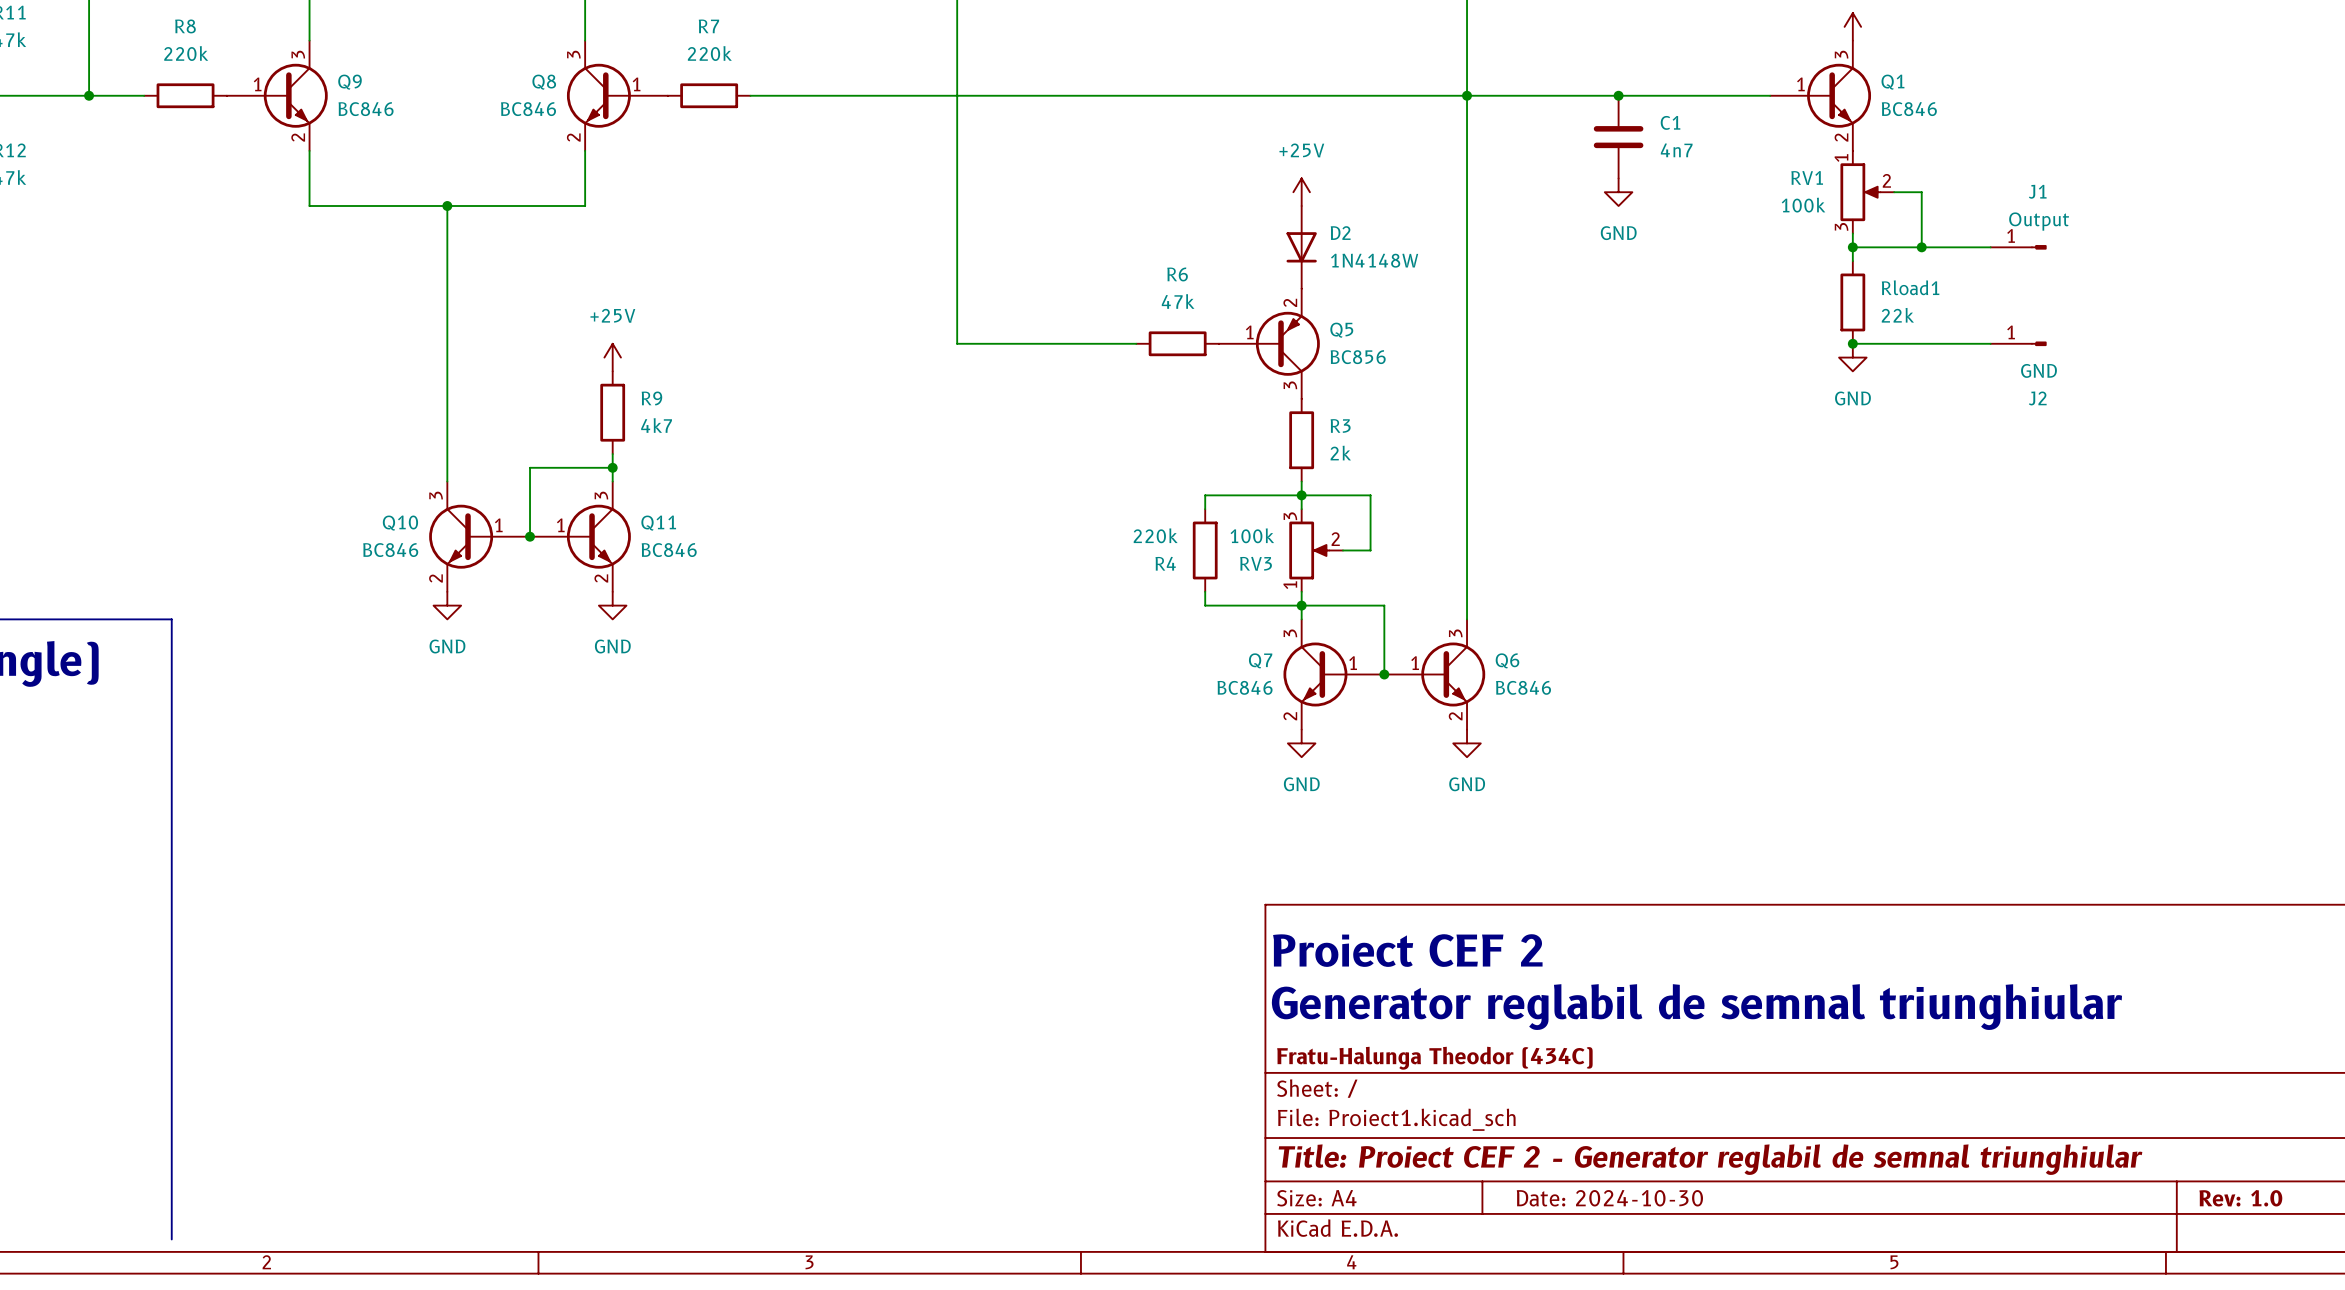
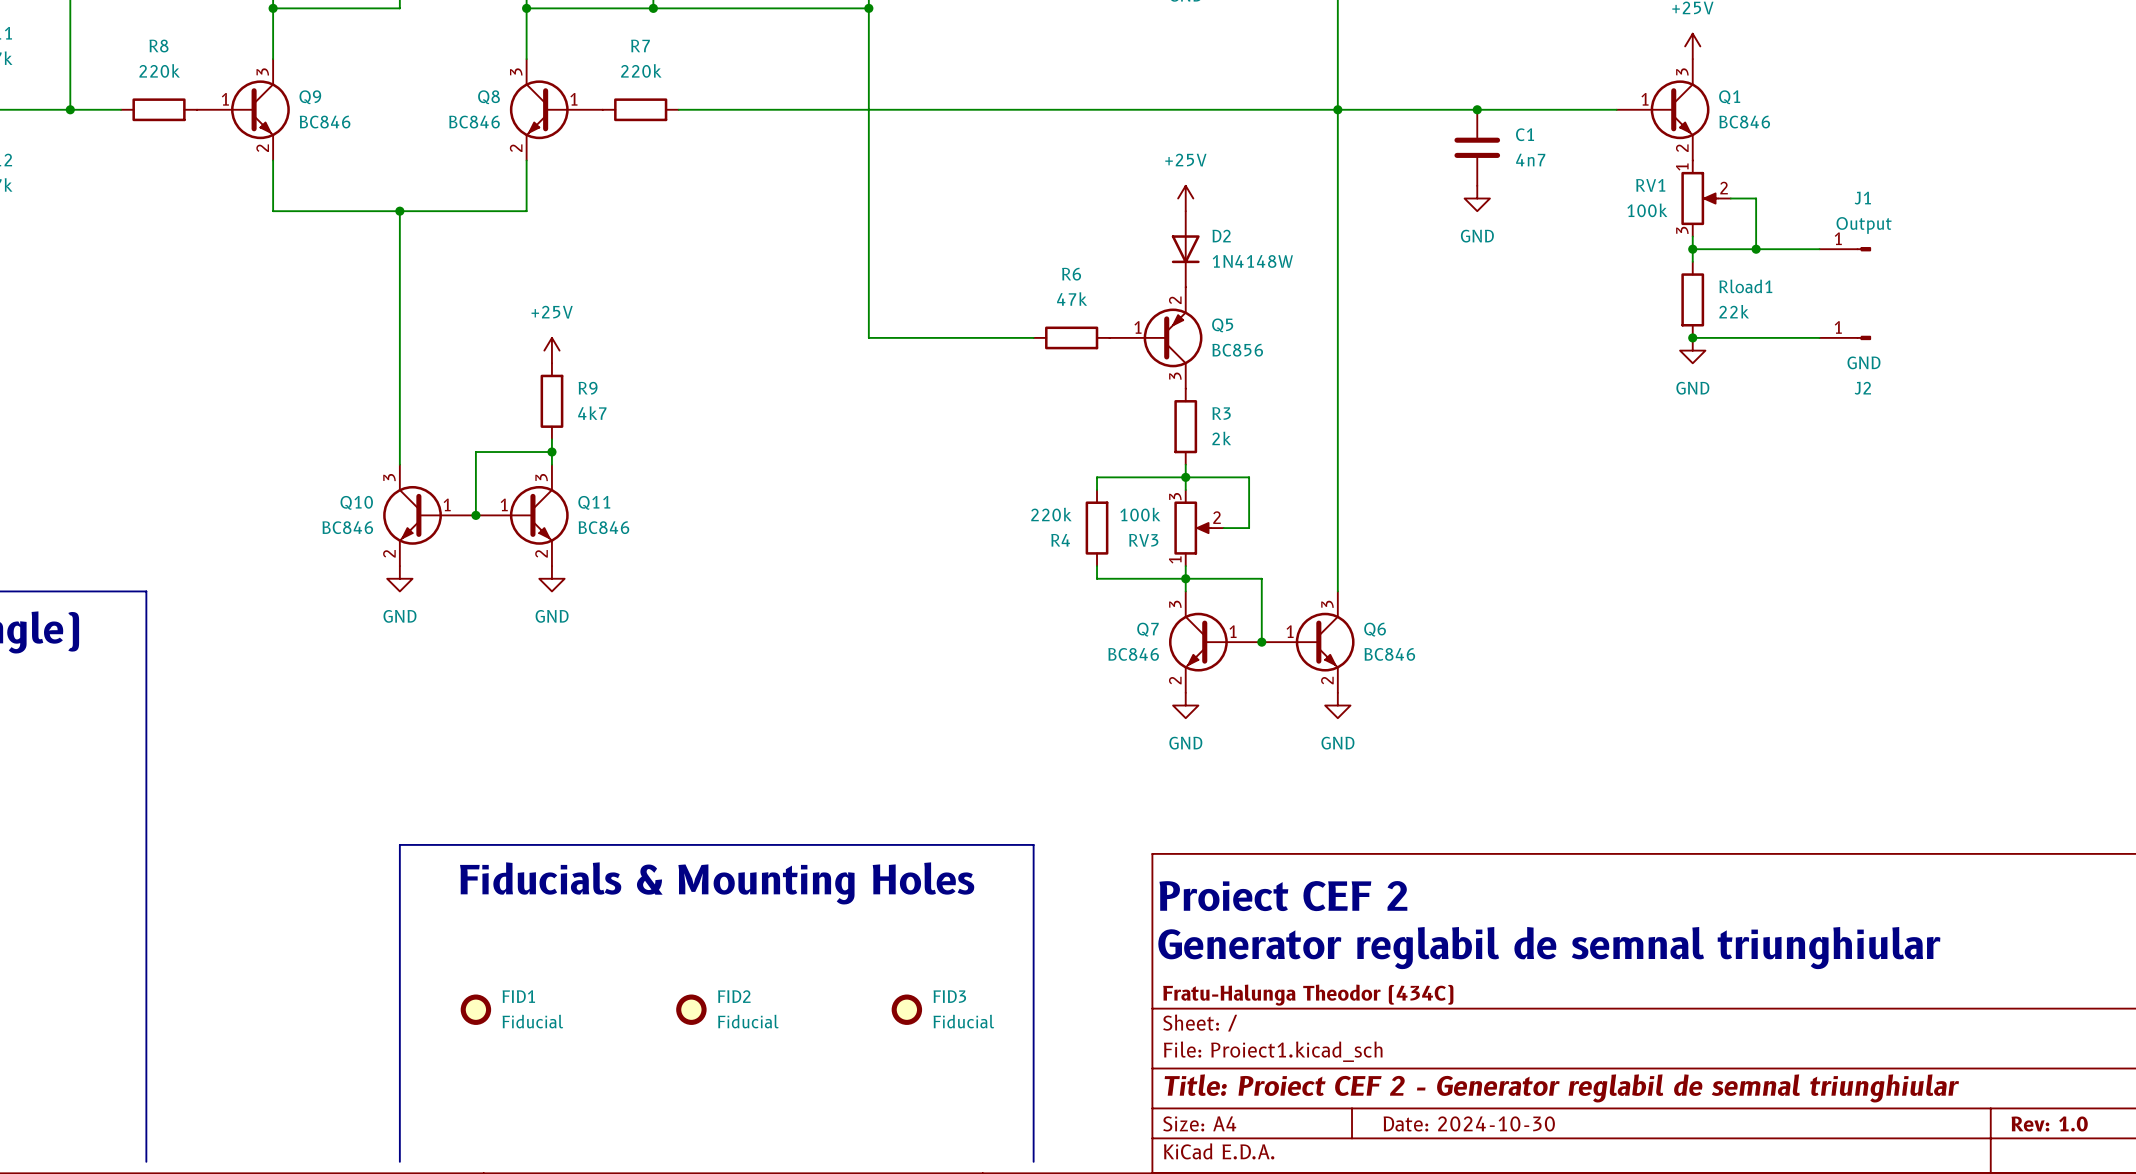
text: none -> Fiducials & Mounting Holes (717, 883)
FID1: none -> Fiducial (475, 1009)
FID2: none -> Fiducial (691, 1009)
FID3: none -> Fiducial (906, 1009)
line: none -> (399, 1161) (399, 844) (1033, 844) (1033, 1161)

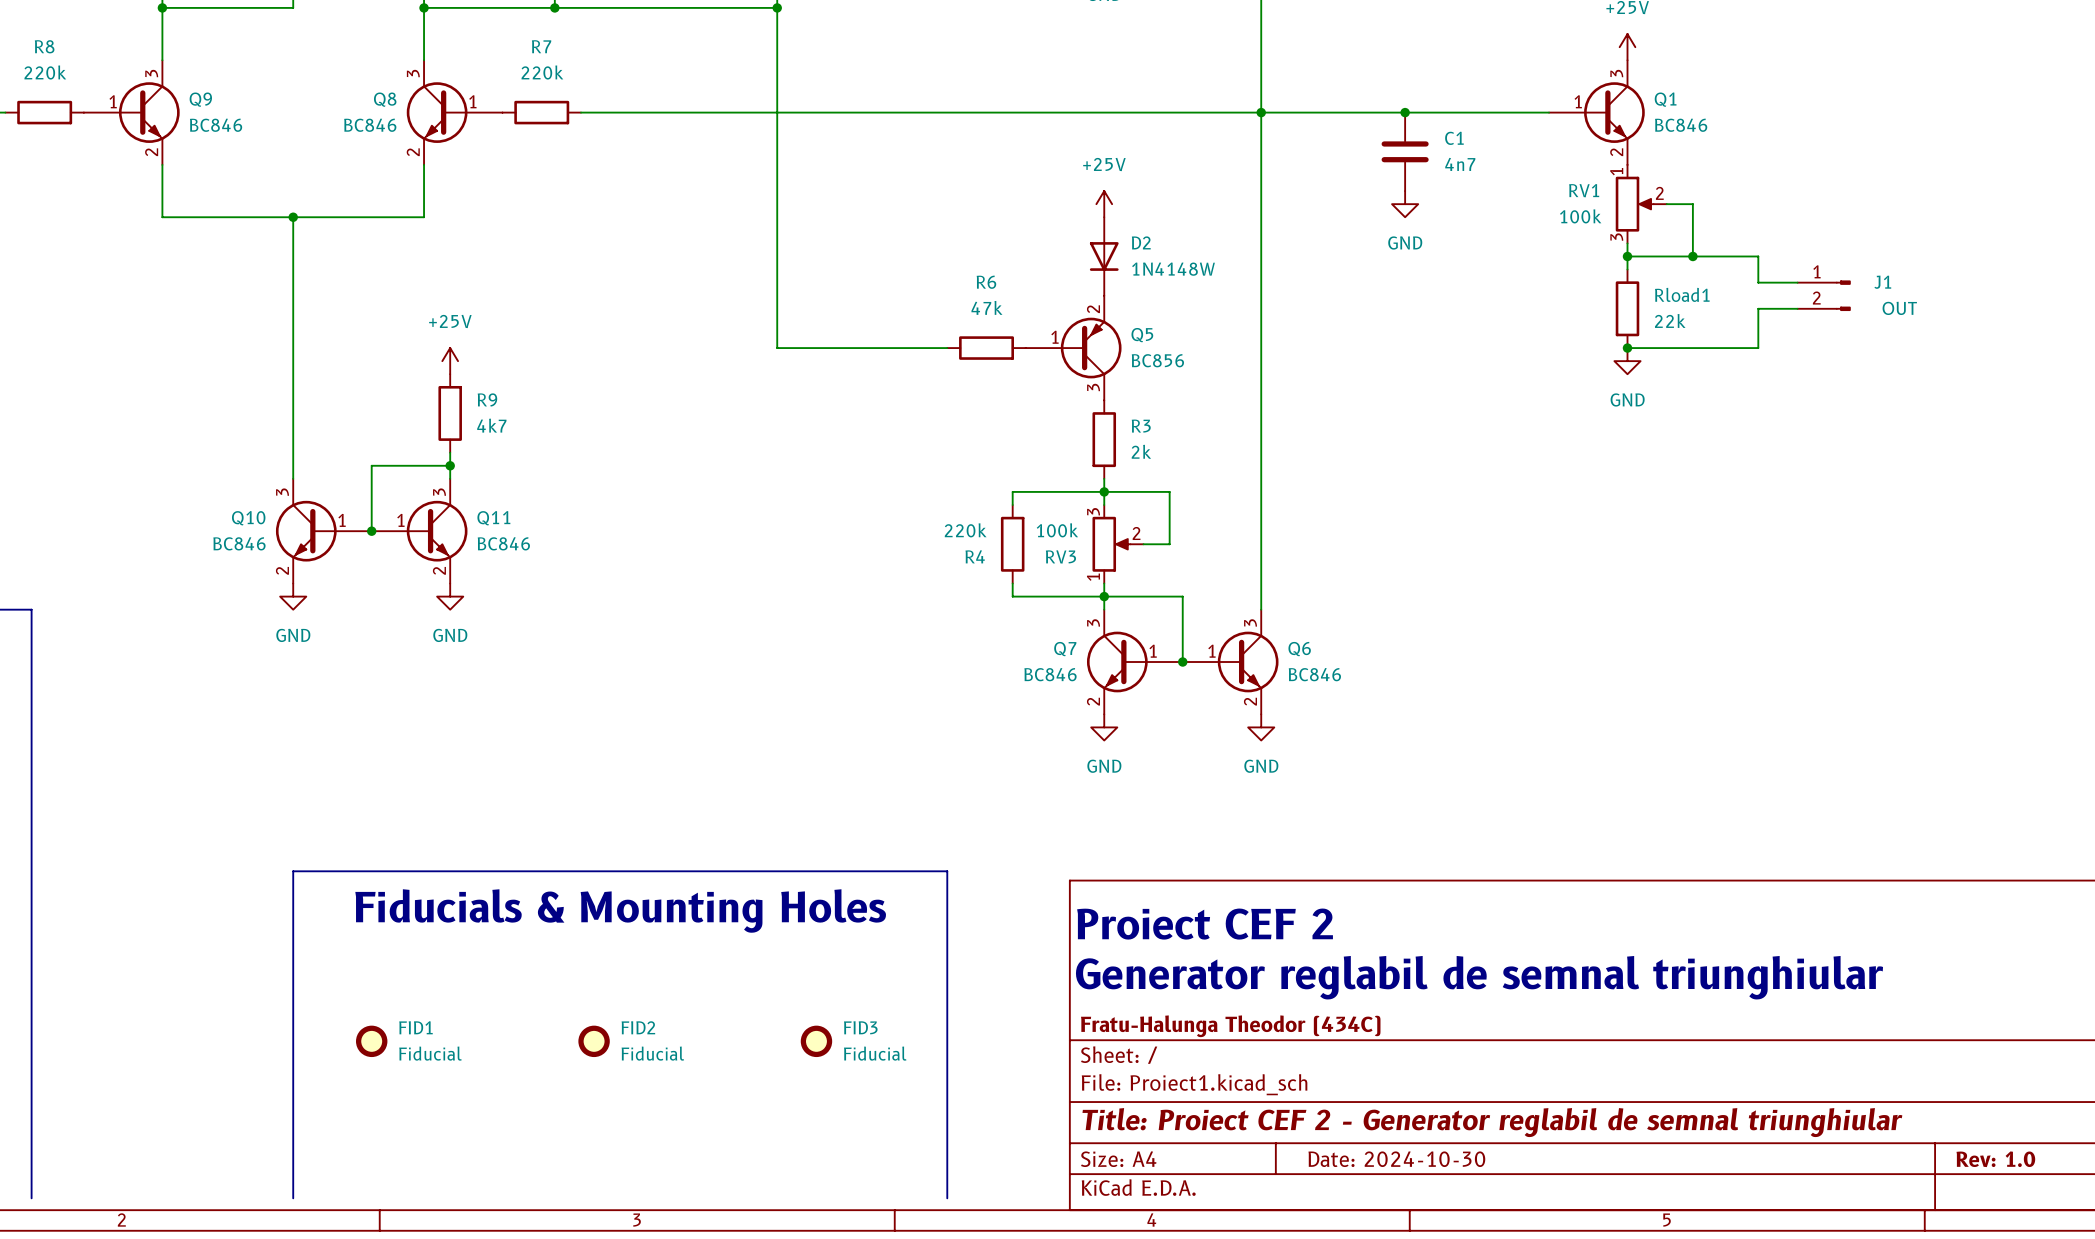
J1 name position: J1 (1862, 198) -> J1 (1882, 282)
J1 value: Output (1864, 225) -> OUT (1899, 308)
J1 symbol: [1819, 247, 1871, 252] -> [1797, 280, 1851, 311]
wire: none -> (1758, 256) (1758, 282) (1797, 282)
wire: none -> (1797, 308) (1758, 308) (1758, 348)
J2: GND (1845, 337) -> none

